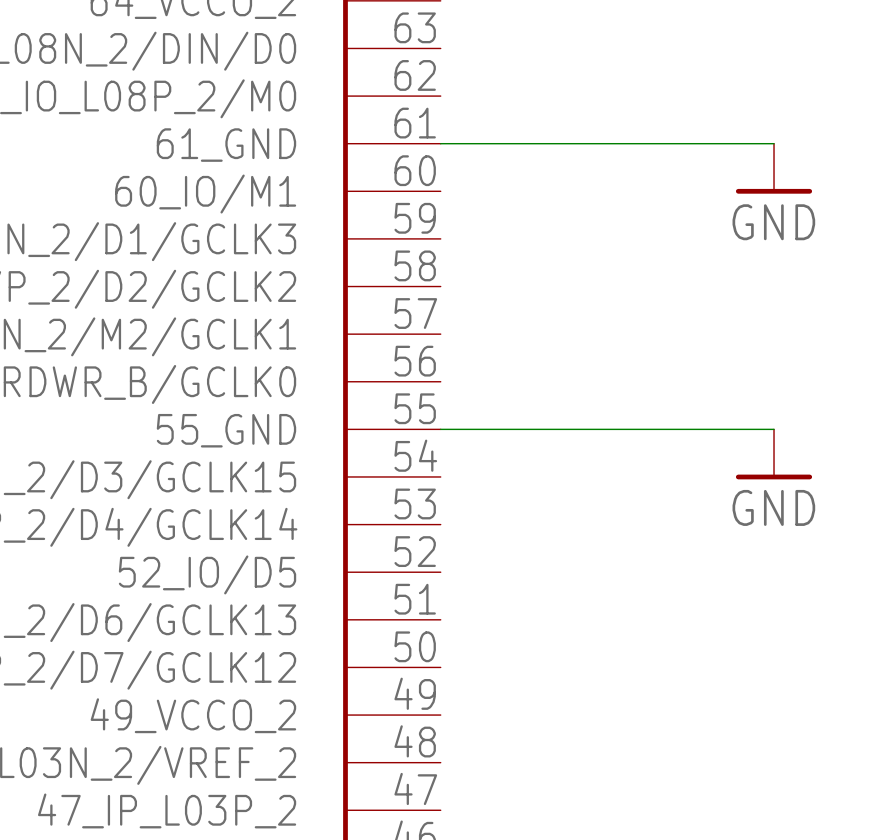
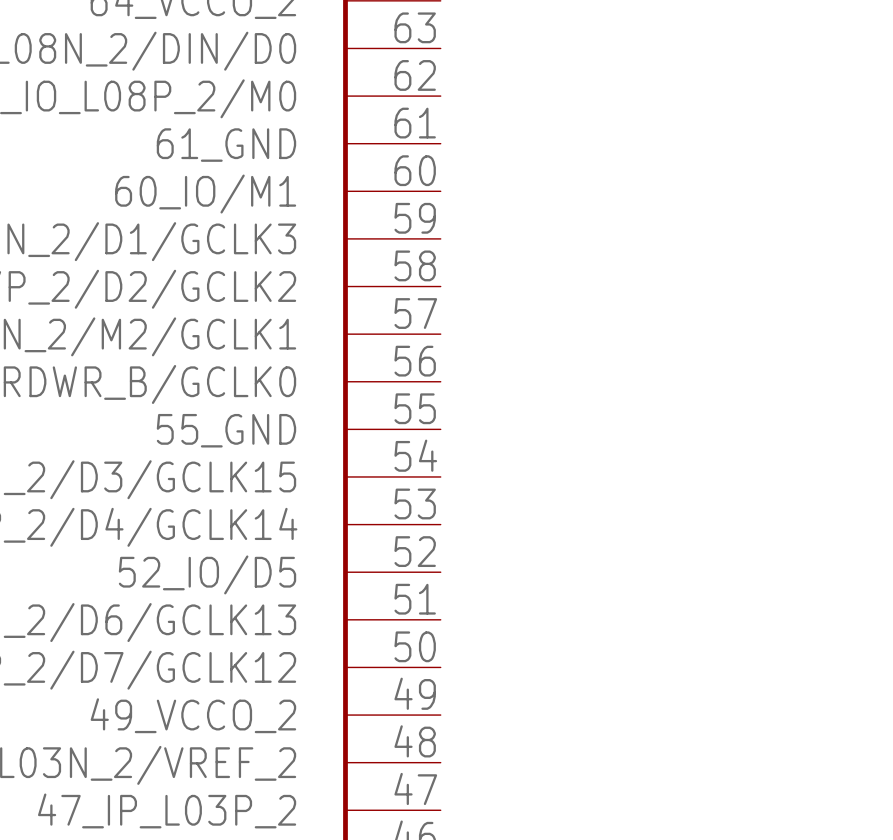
wire: (440, 143) (774, 143) -> none
power symbol: GND (774, 168) -> none
wire: (440, 429) (774, 429) -> none
power symbol: GND (774, 454) -> none

